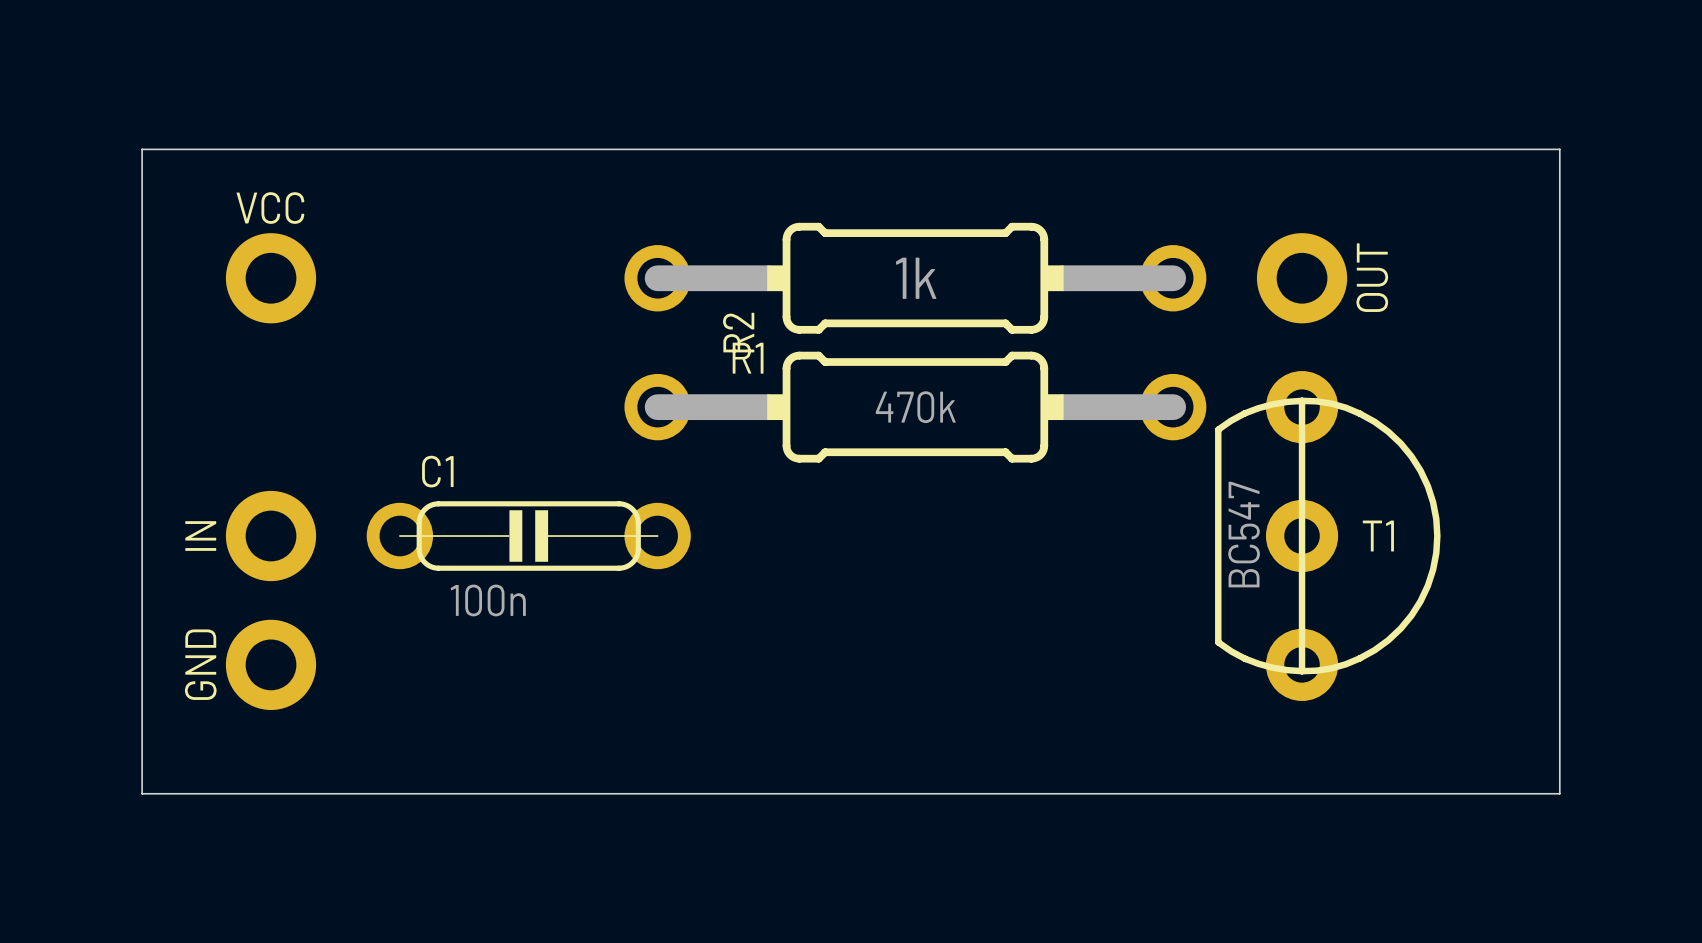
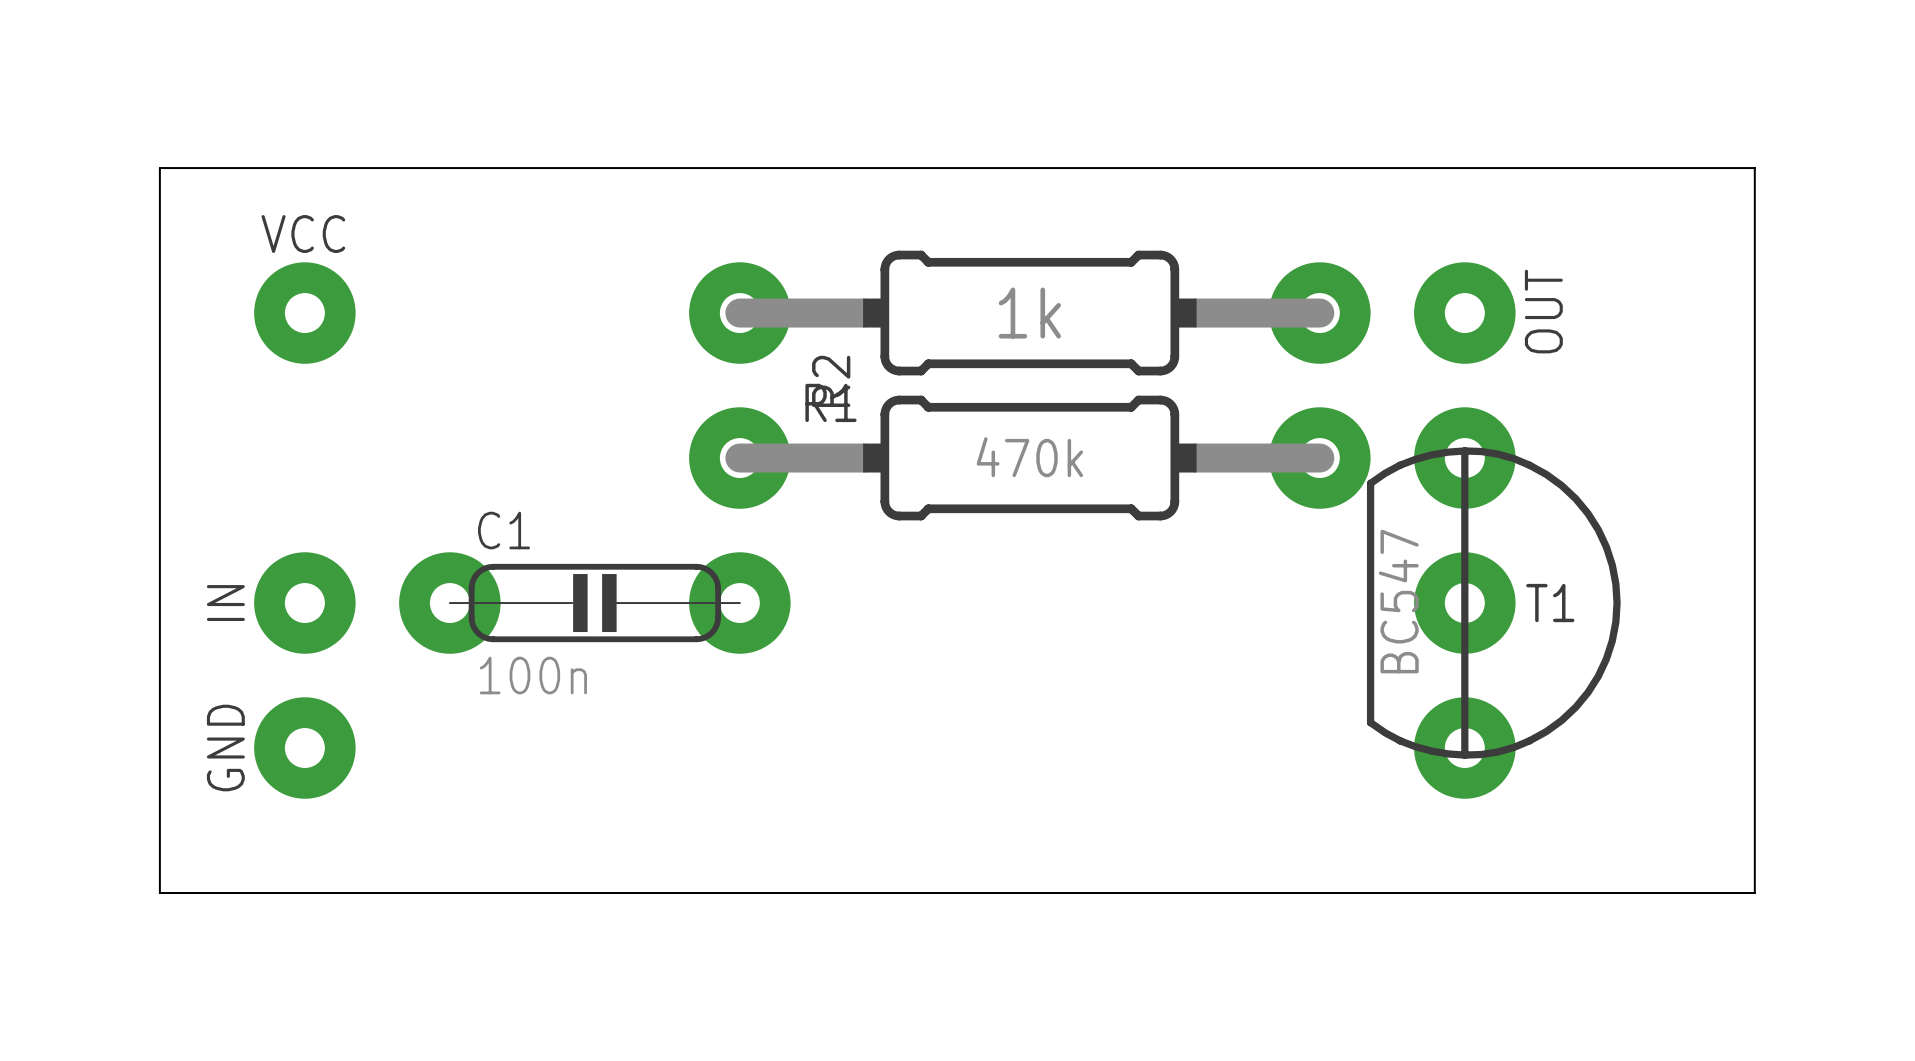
R2 footprint: [624, 222, 1207, 334] -> [689, 250, 1371, 376]
VCC footprint: [225, 233, 317, 324] -> [254, 262, 356, 364]
OUT footprint: [1256, 233, 1348, 324] -> [1414, 262, 1516, 364]
R1 footprint: [624, 351, 1207, 463] -> [689, 395, 1371, 521]
T1 footprint: [1215, 371, 1441, 701] -> [1366, 407, 1621, 799]
IN footprint: [225, 490, 317, 582] -> [254, 552, 356, 654]
C1 footprint: [366, 501, 691, 571] -> [399, 552, 791, 654]
GND footprint: [225, 619, 317, 711] -> [254, 697, 356, 799]

